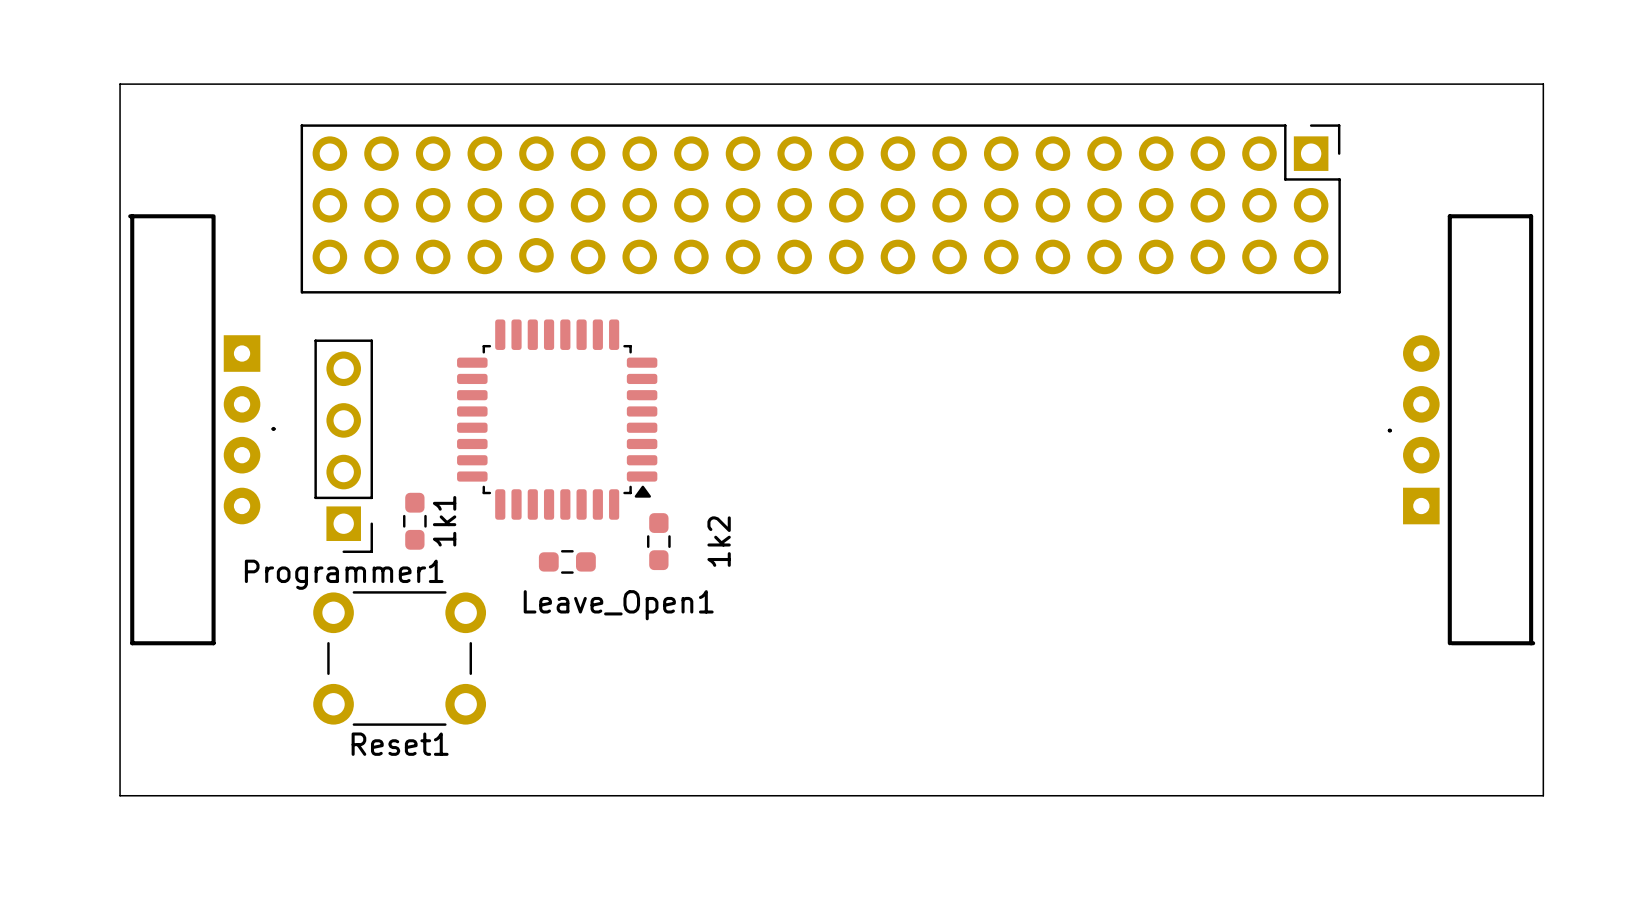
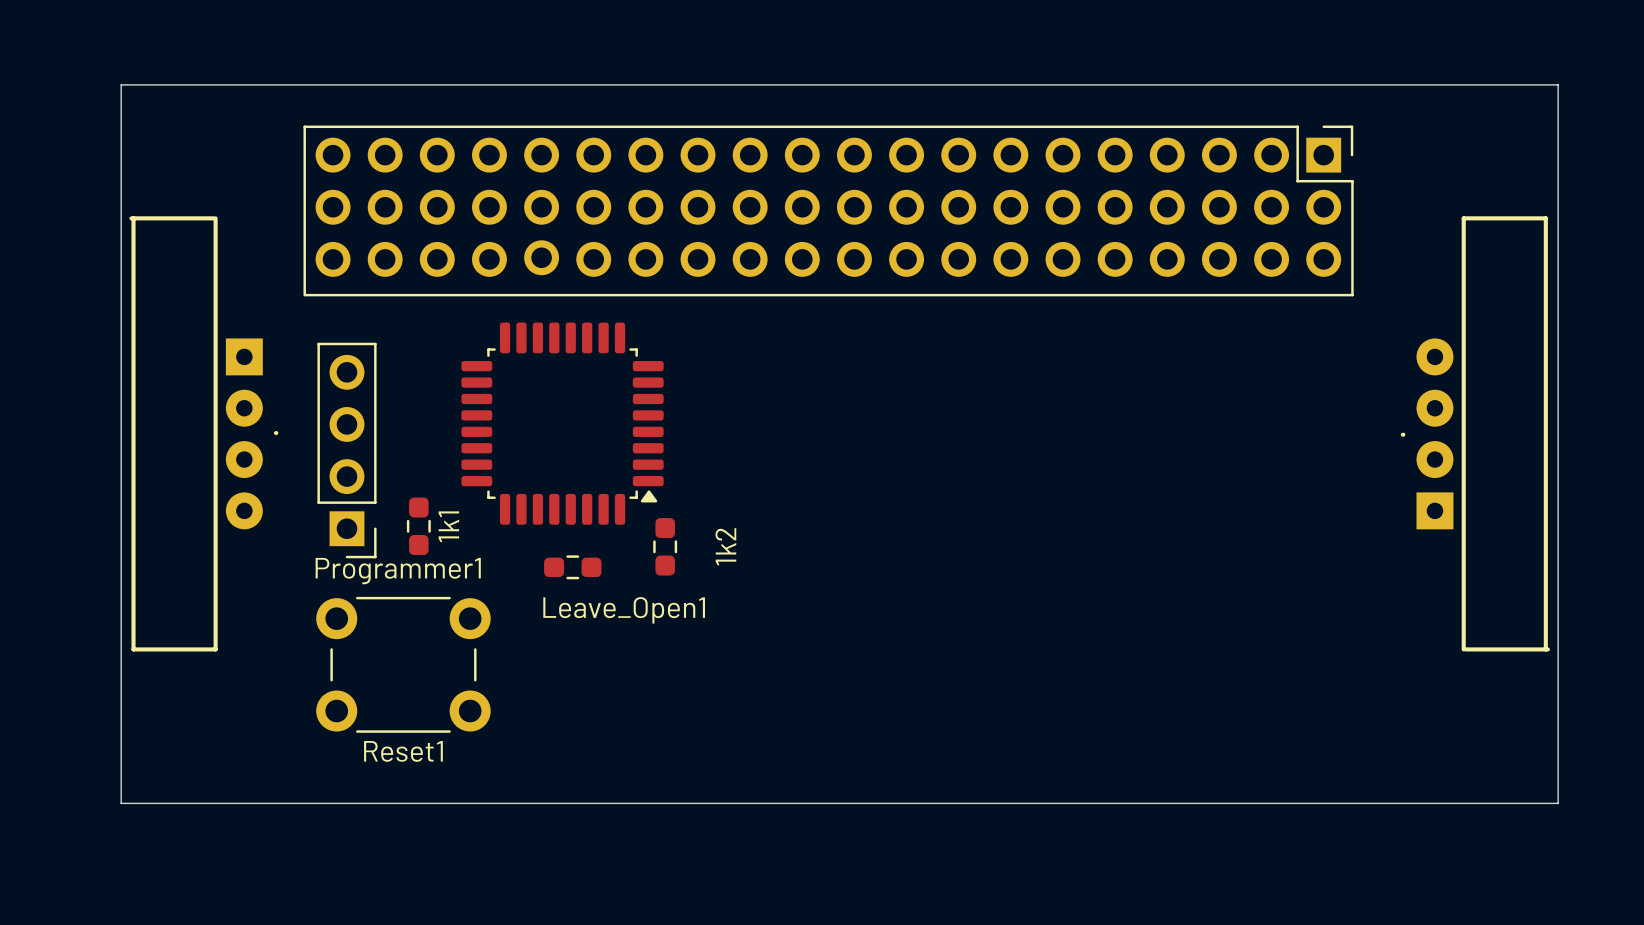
Programmer1 name position: Programmer1 (344, 574) -> Programmer1 (398, 571)

